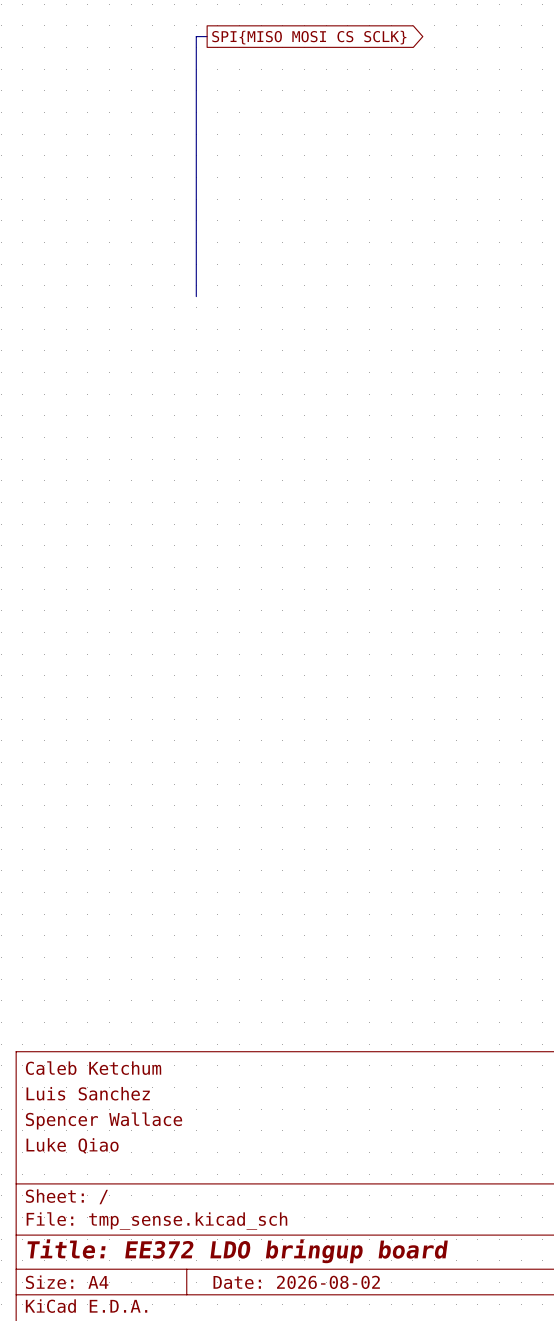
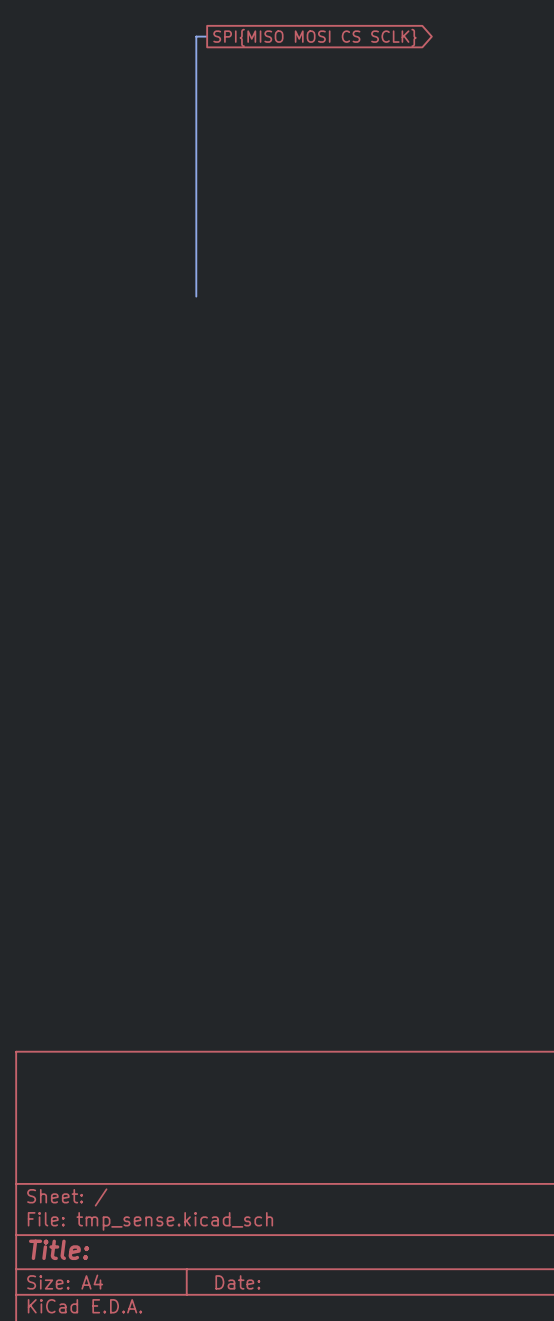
title block: Caleb Ketchum (93, 1068) -> none
title block: Luis Sanchez (88, 1093) -> none
title block: Spencer Wallace (104, 1120) -> none
title block: Luke Qiao (72, 1145) -> none
title block: Title: EE372 LDO bringup board (237, 1251) -> Title: (59, 1249)
title block: Date: 2026-08-02 (296, 1282) -> Date: (237, 1282)

